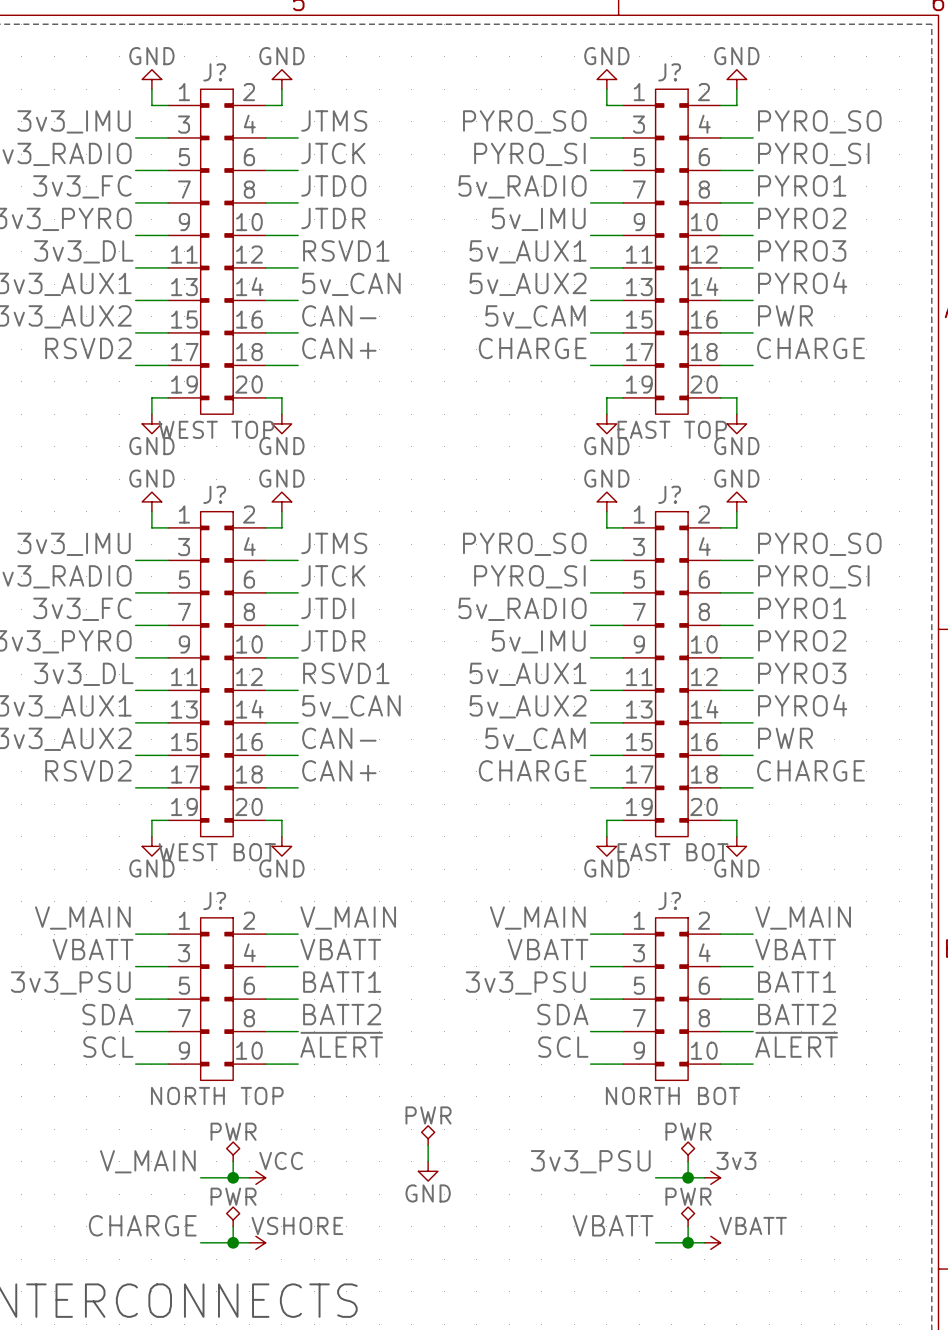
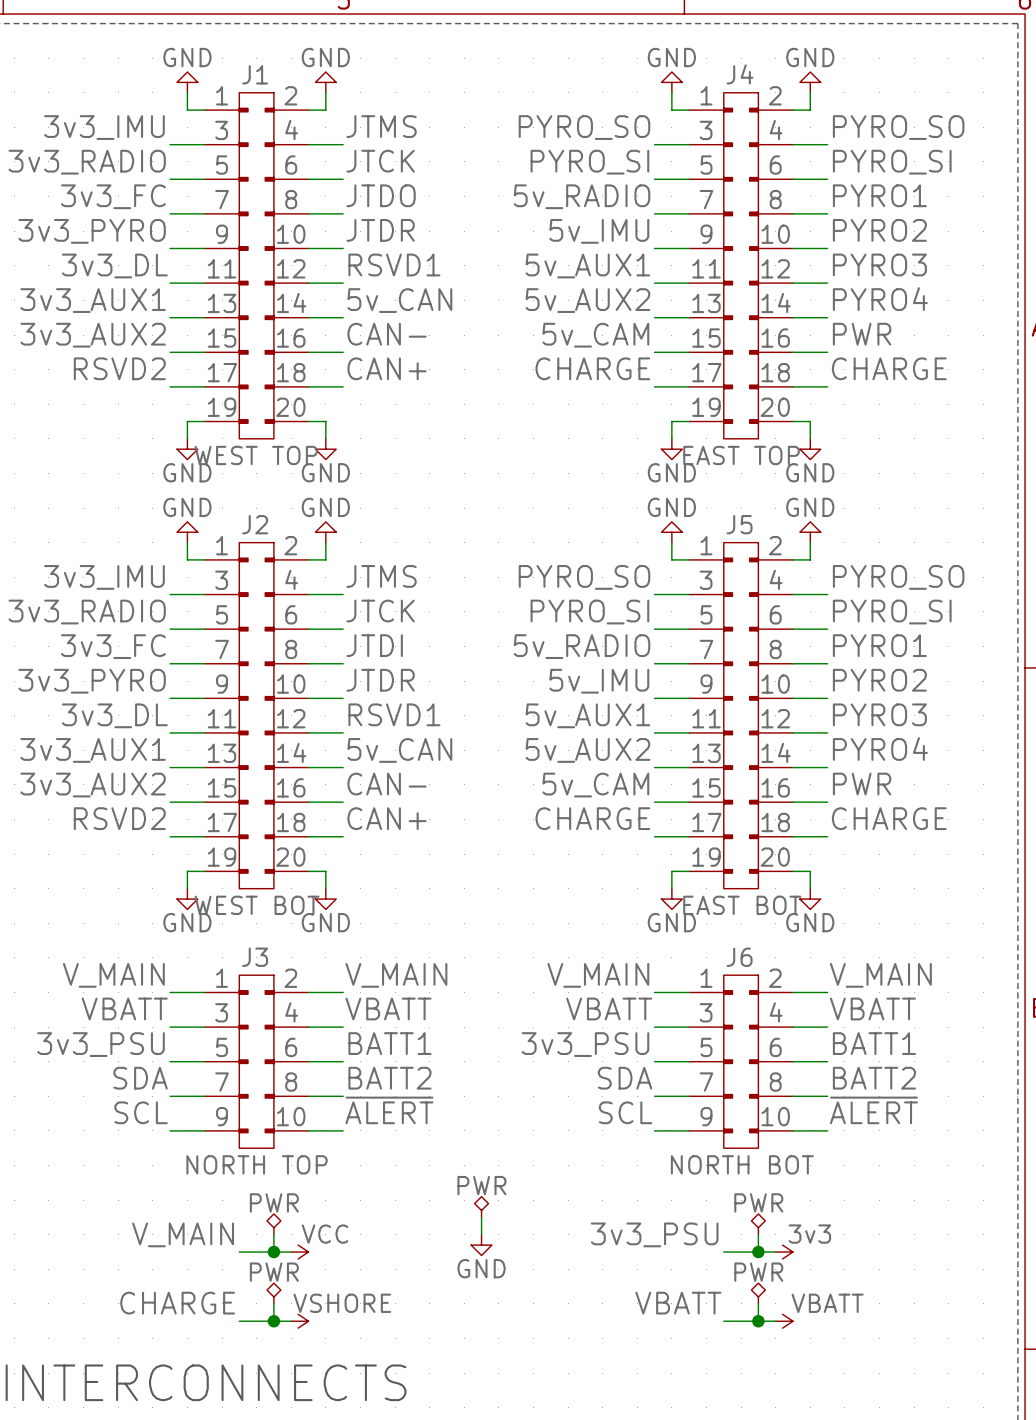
J? name: J? (214, 72) -> J1 (255, 74)
J? name: J? (669, 72) -> J4 (739, 74)
J? name: J? (214, 494) -> J2 (255, 524)
J? name: J? (669, 494) -> J5 (739, 524)
J? name: J? (214, 901) -> J3 (255, 957)
J? name: J? (669, 901) -> J6 (739, 957)

